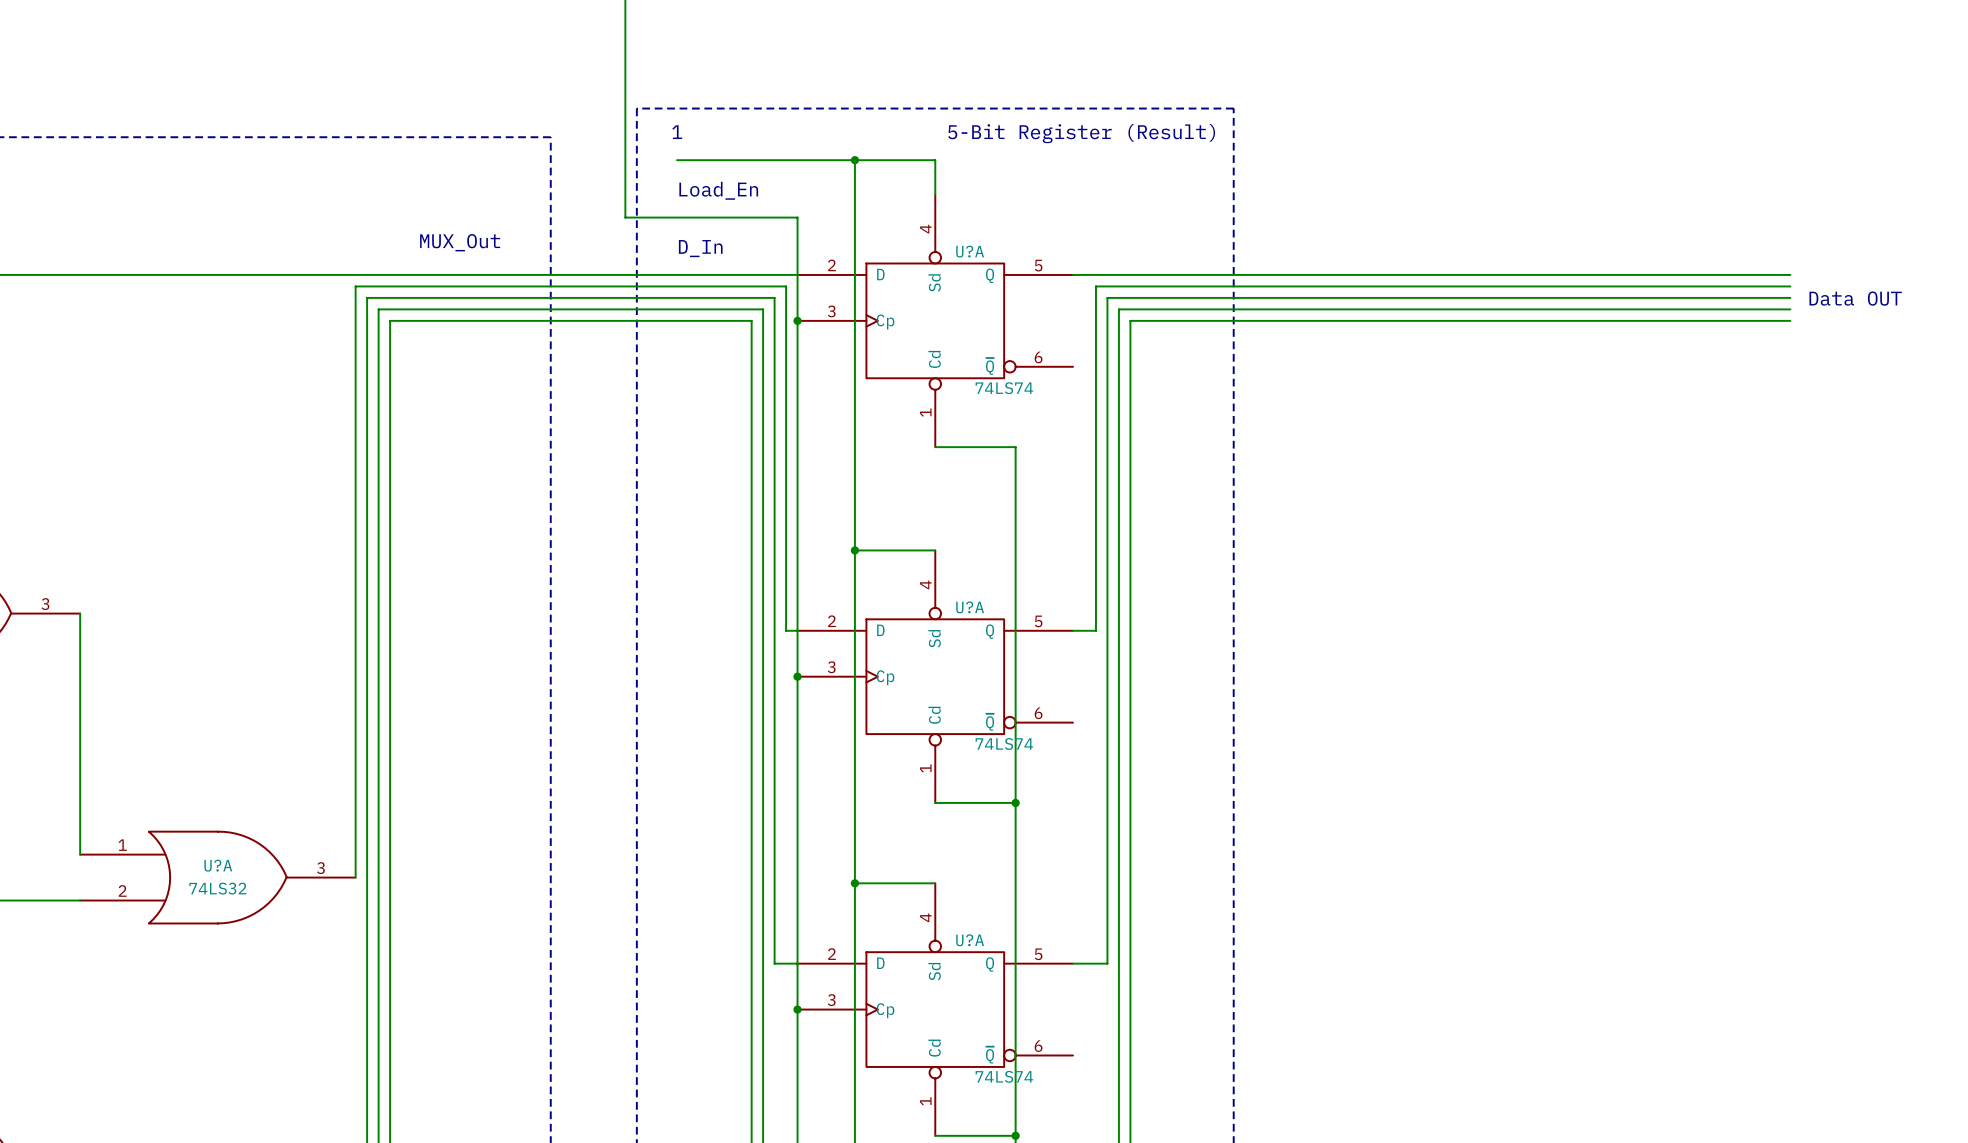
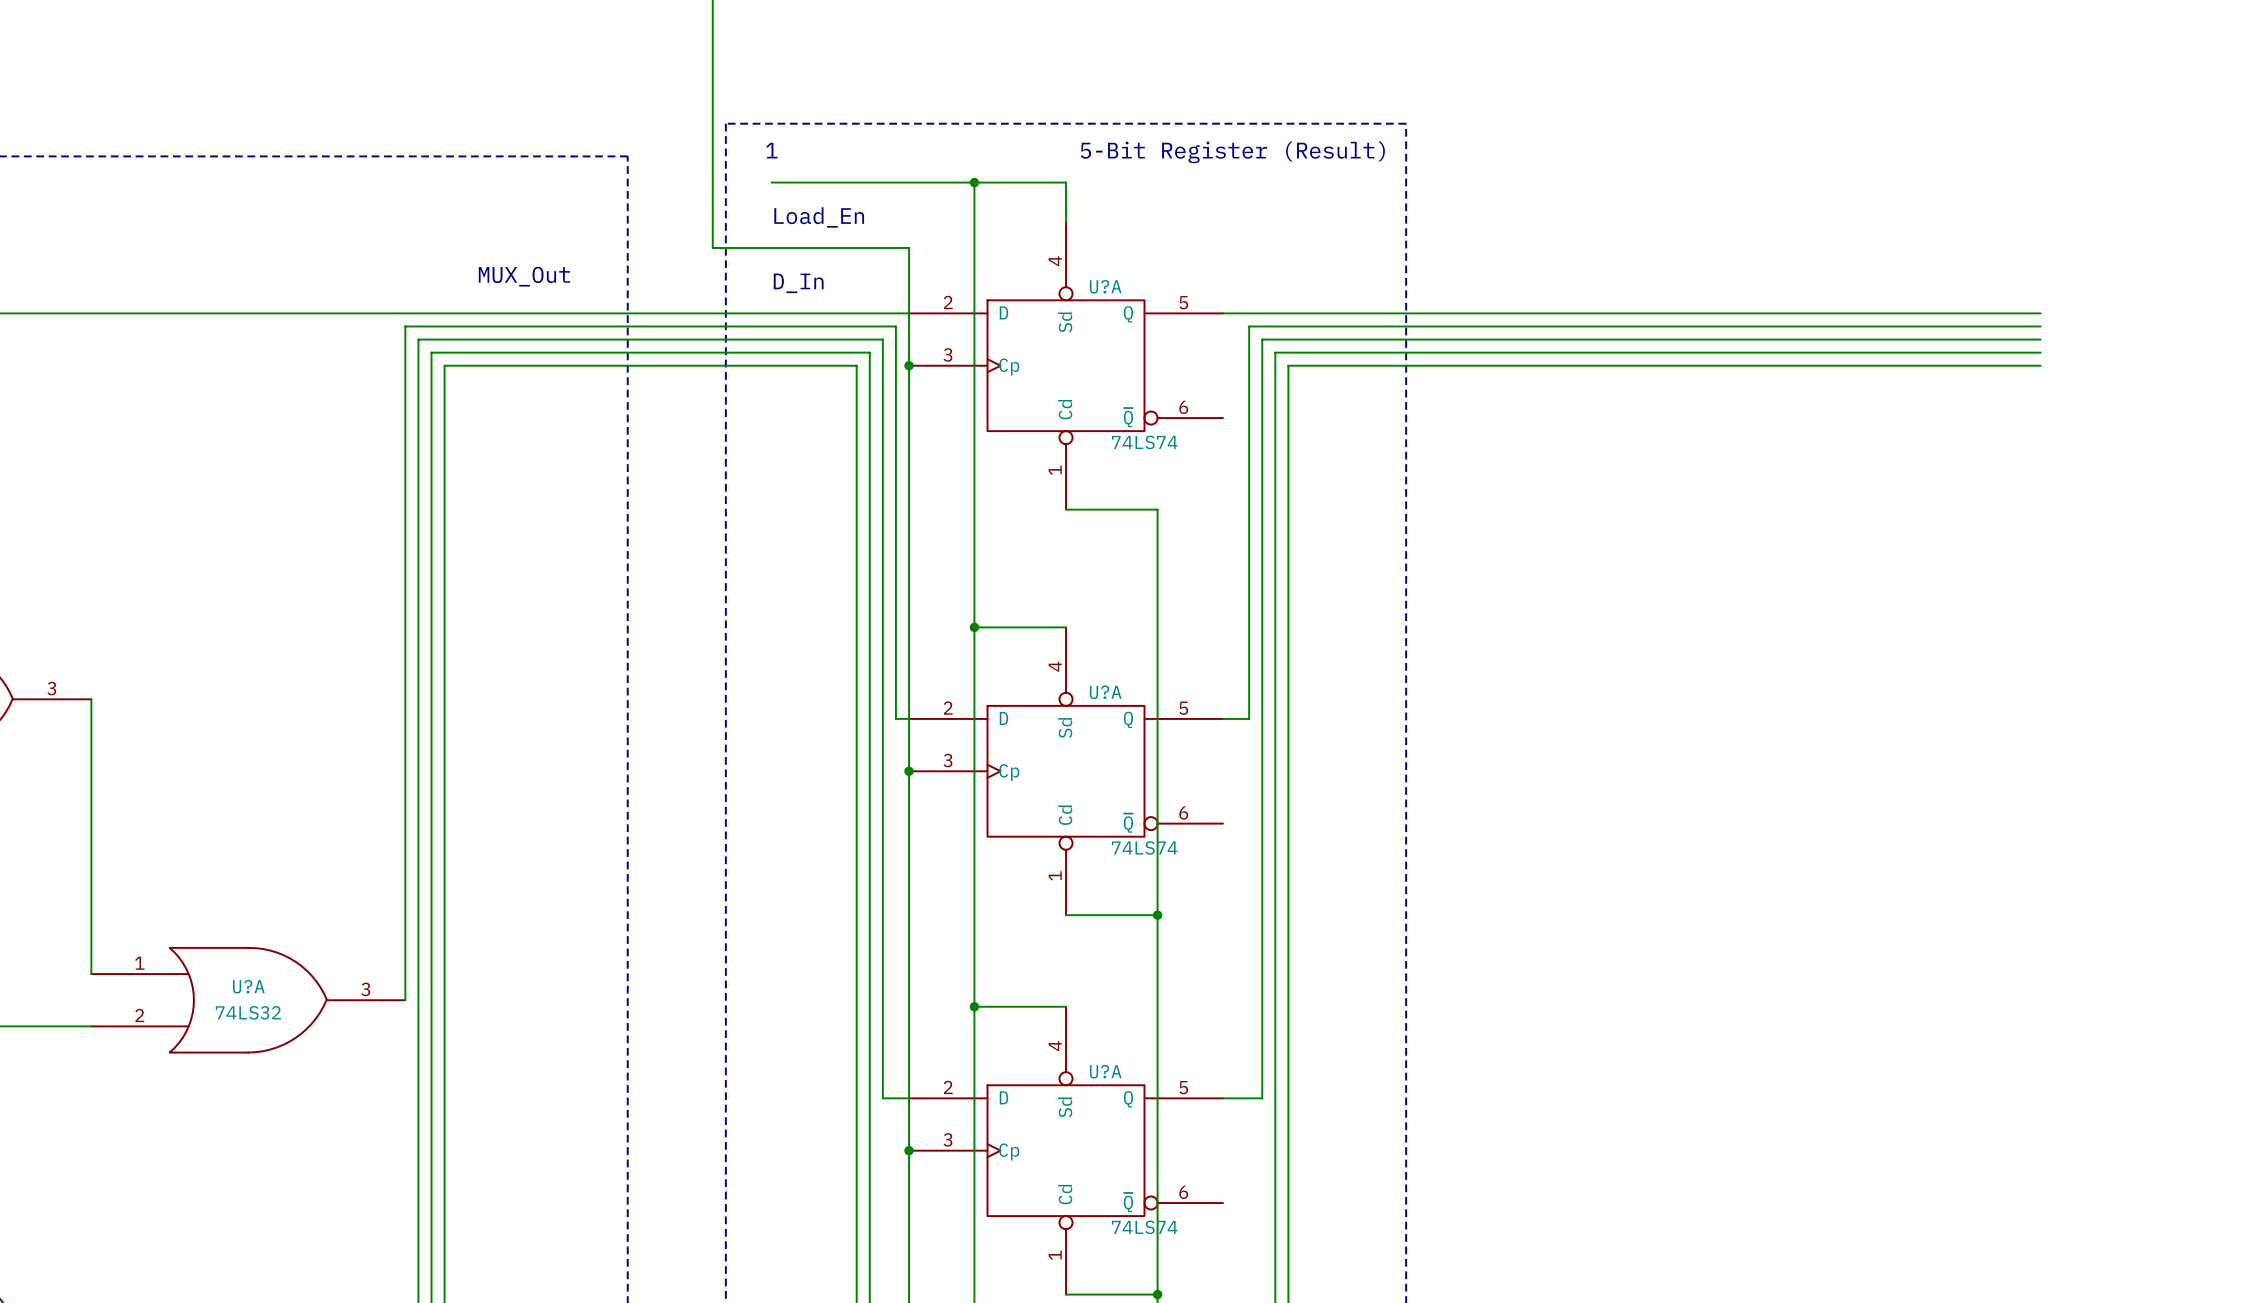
text: Data OUT (1855, 298) -> none

